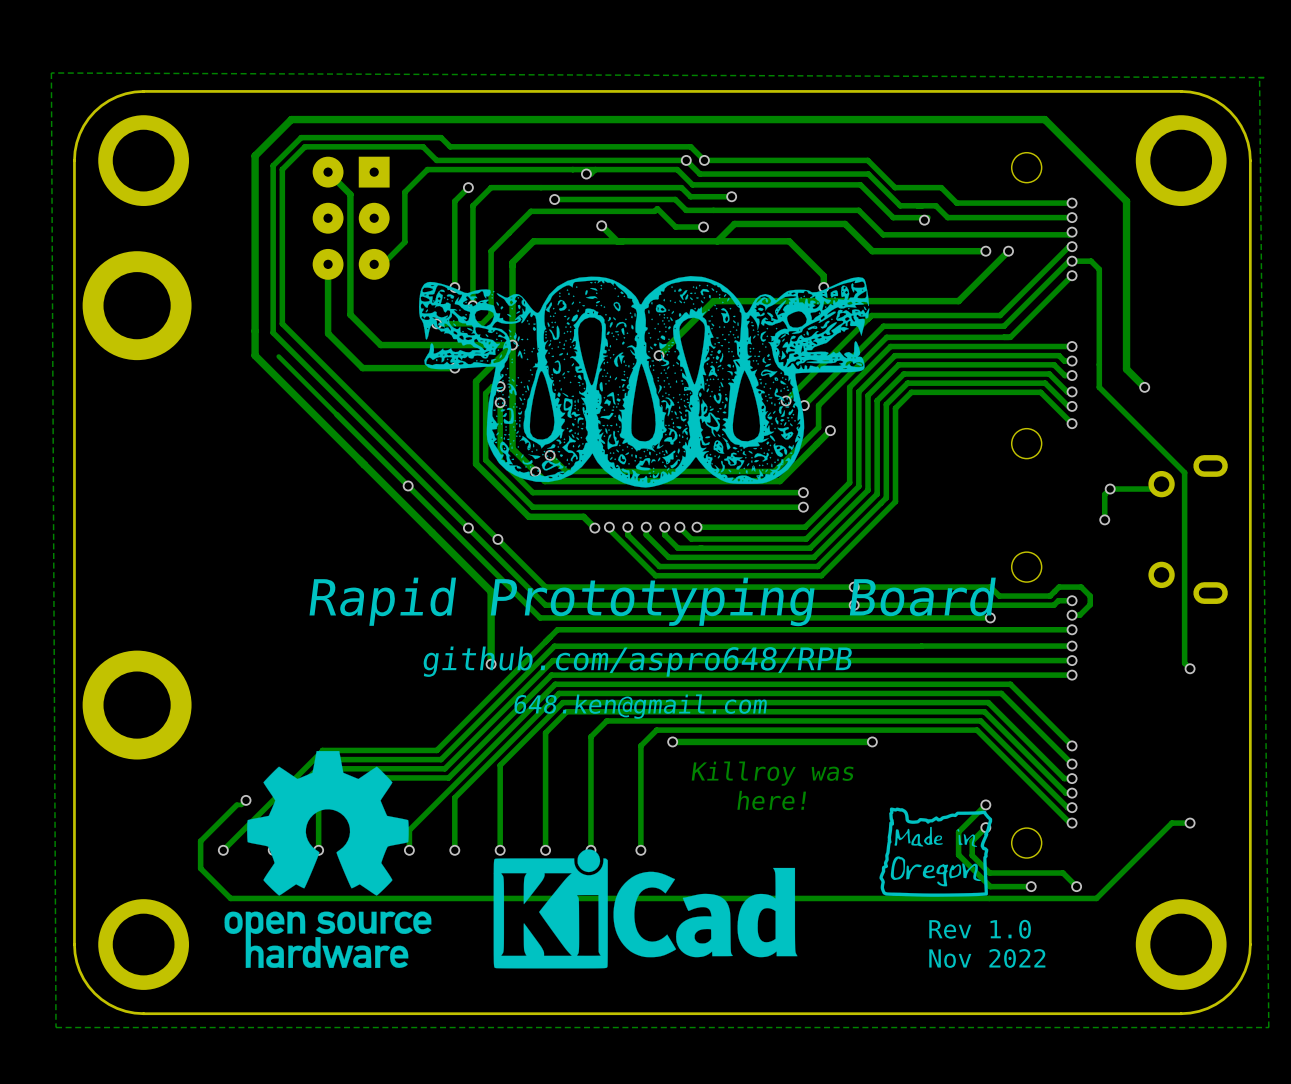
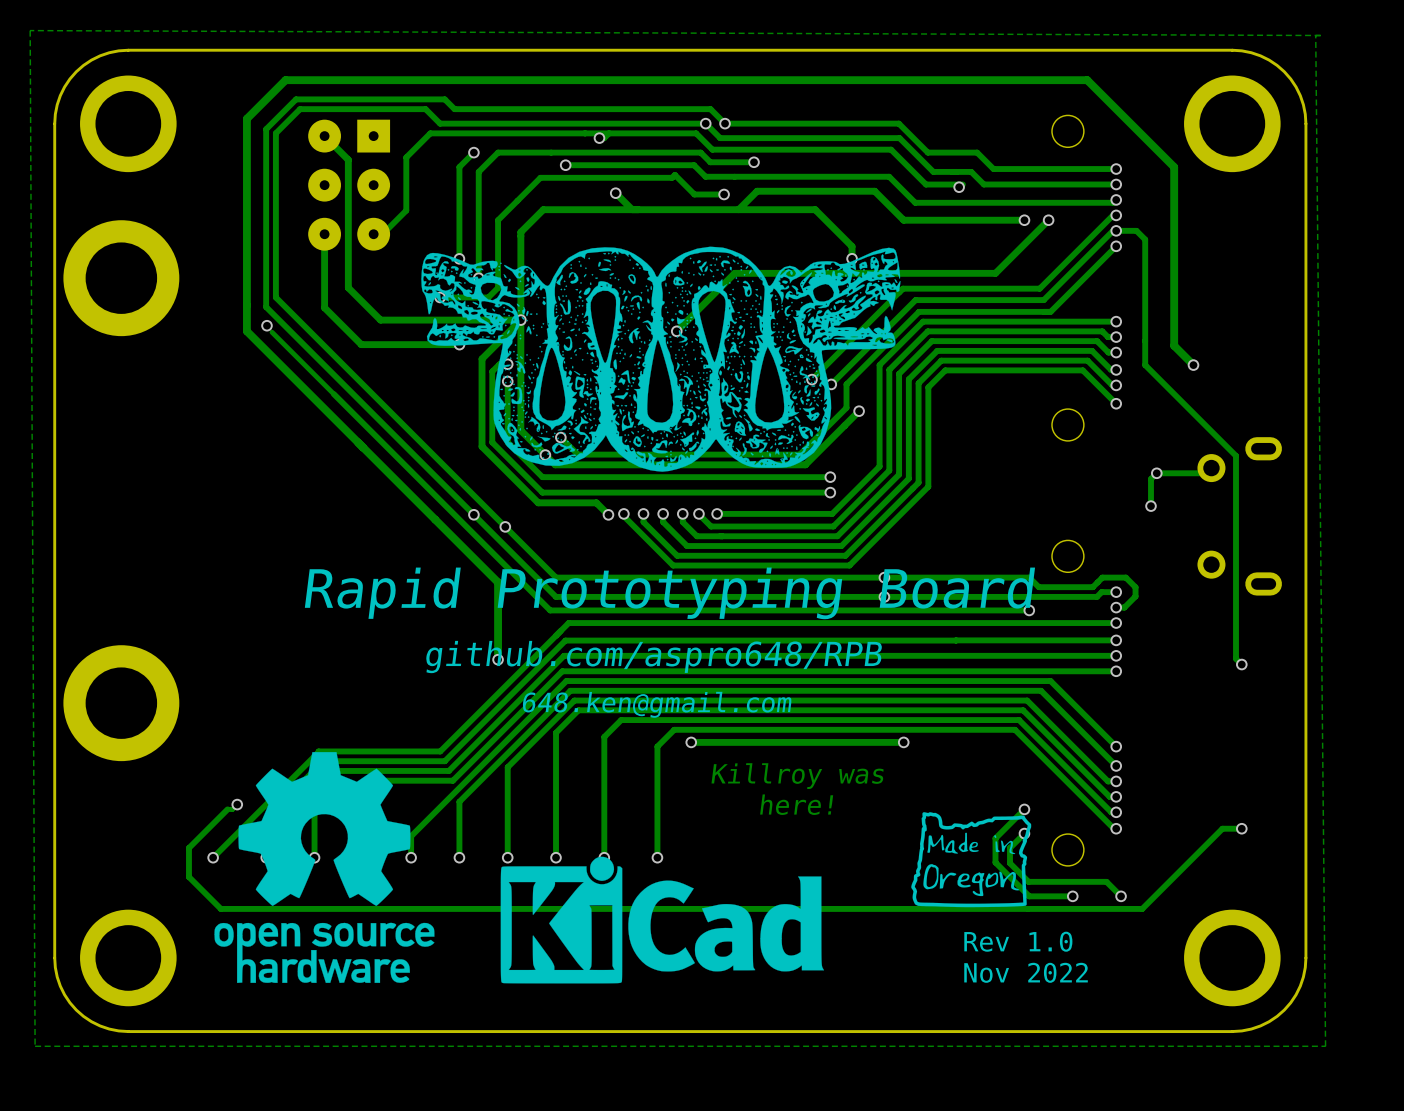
via: none -> (266, 325)
via: (408, 485) -> none

